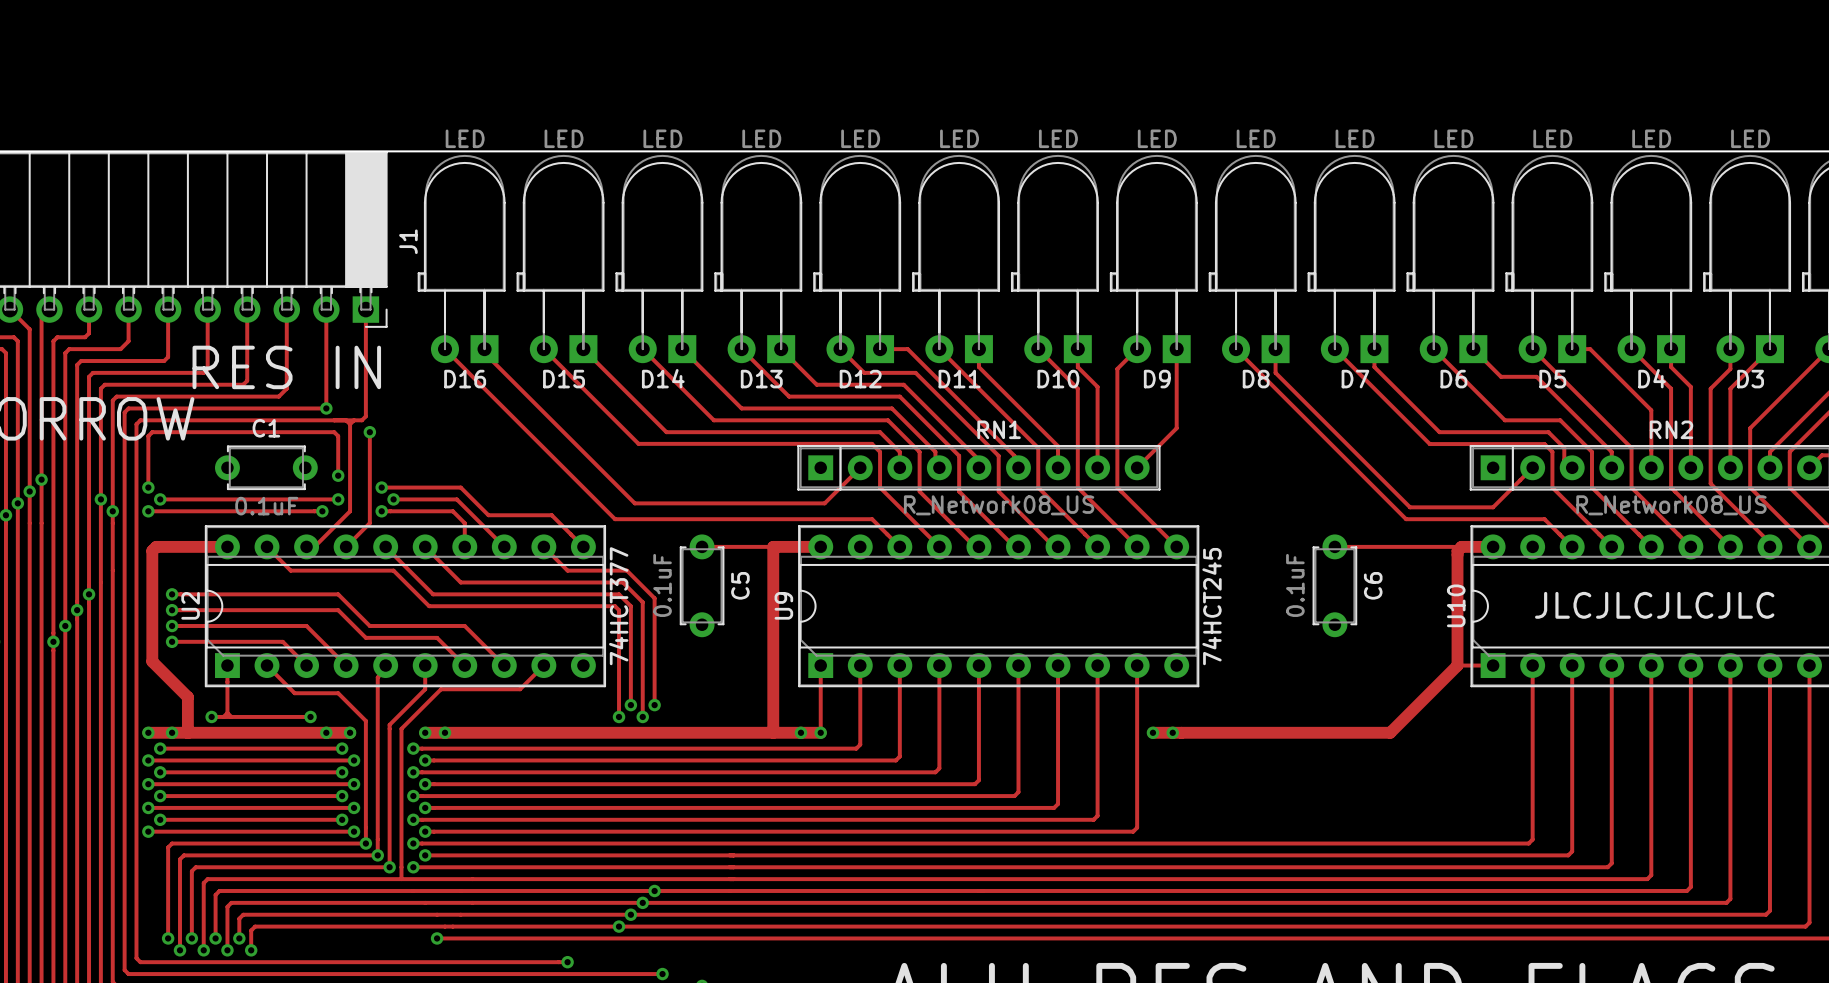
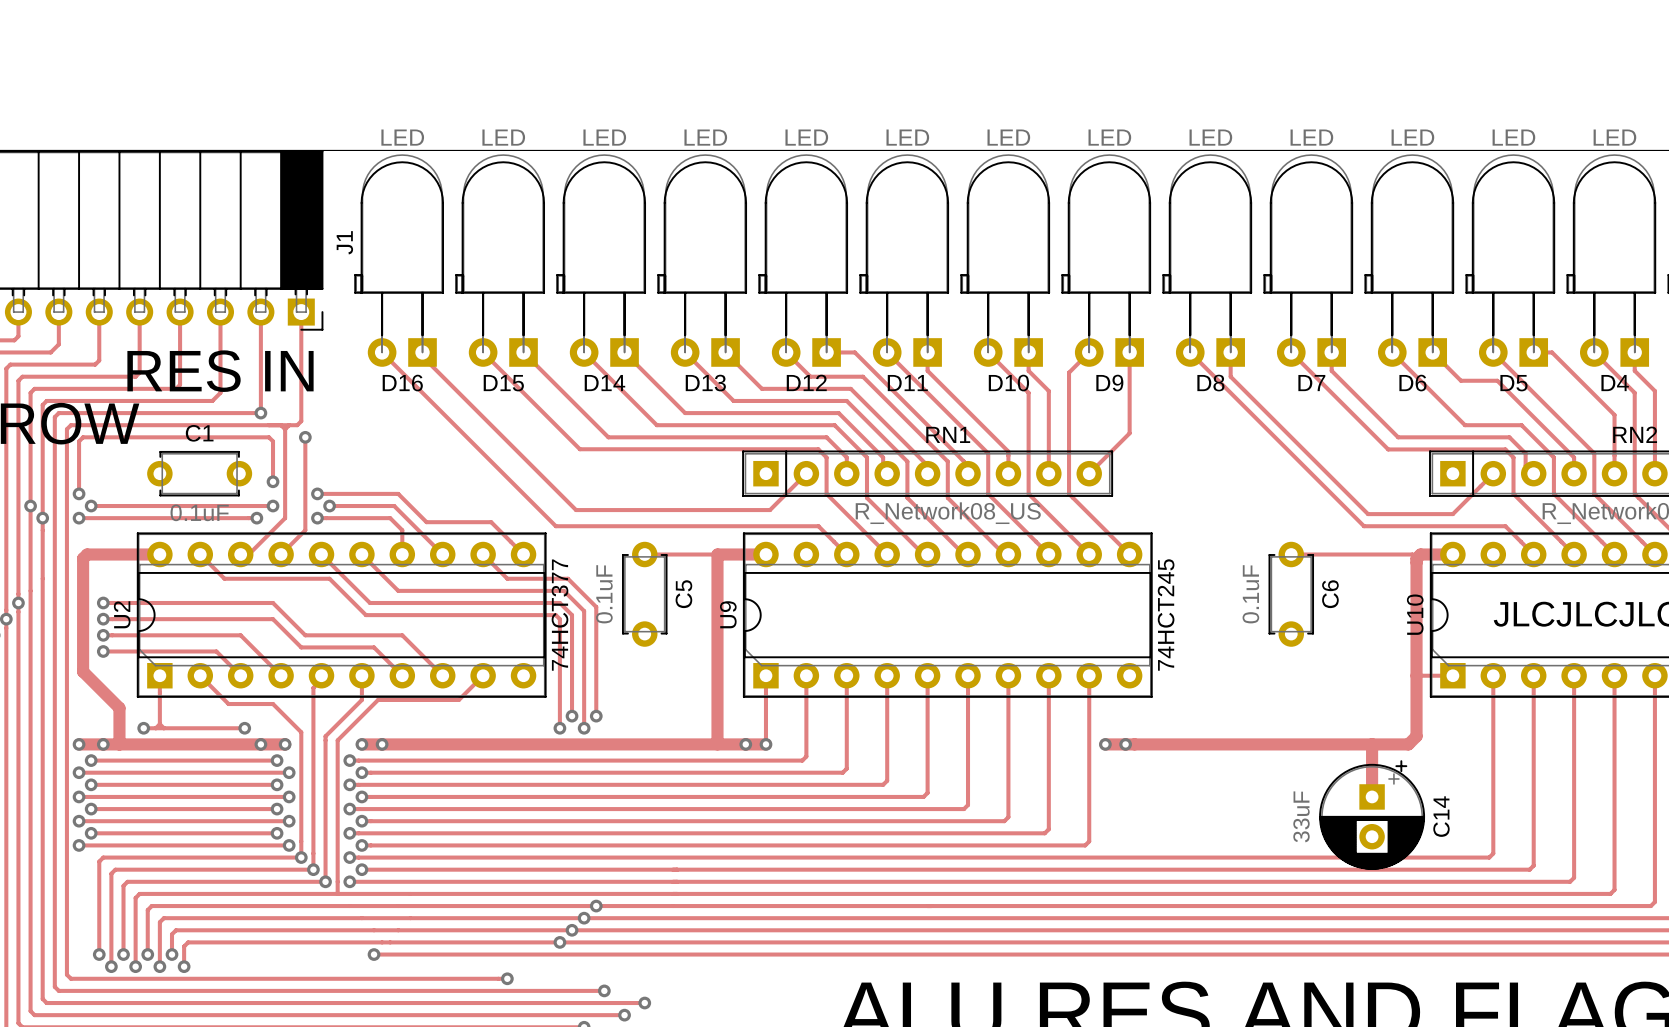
track: (1457, 665) (1390, 732) -> (1416, 675) (1416, 736) (1408, 744) (1347, 744)
track: none -> (1372, 744) (1372, 796)
C14: none -> 33uF (1372, 815)

